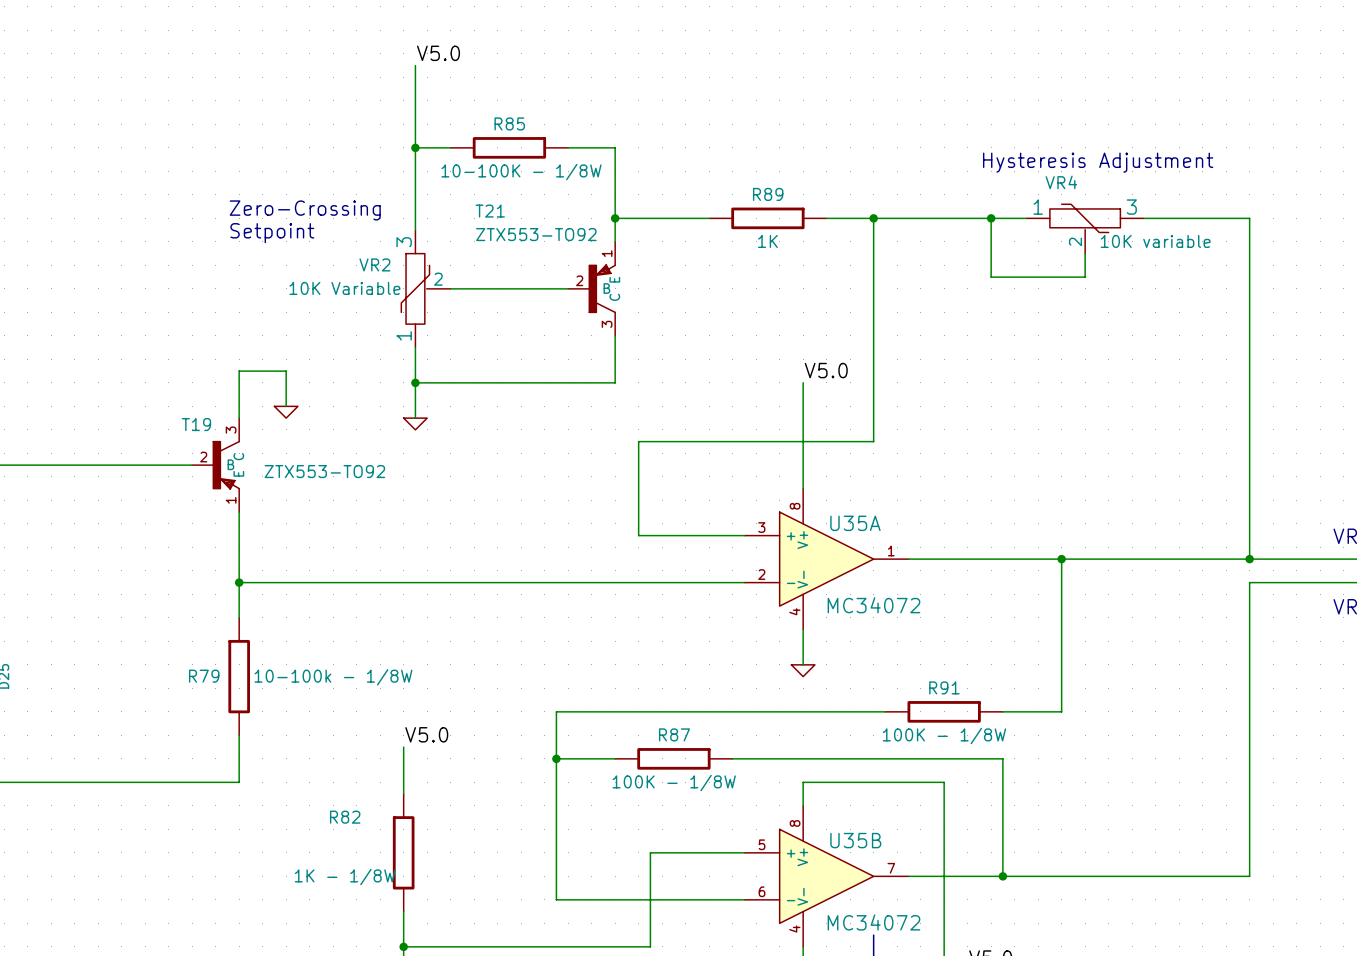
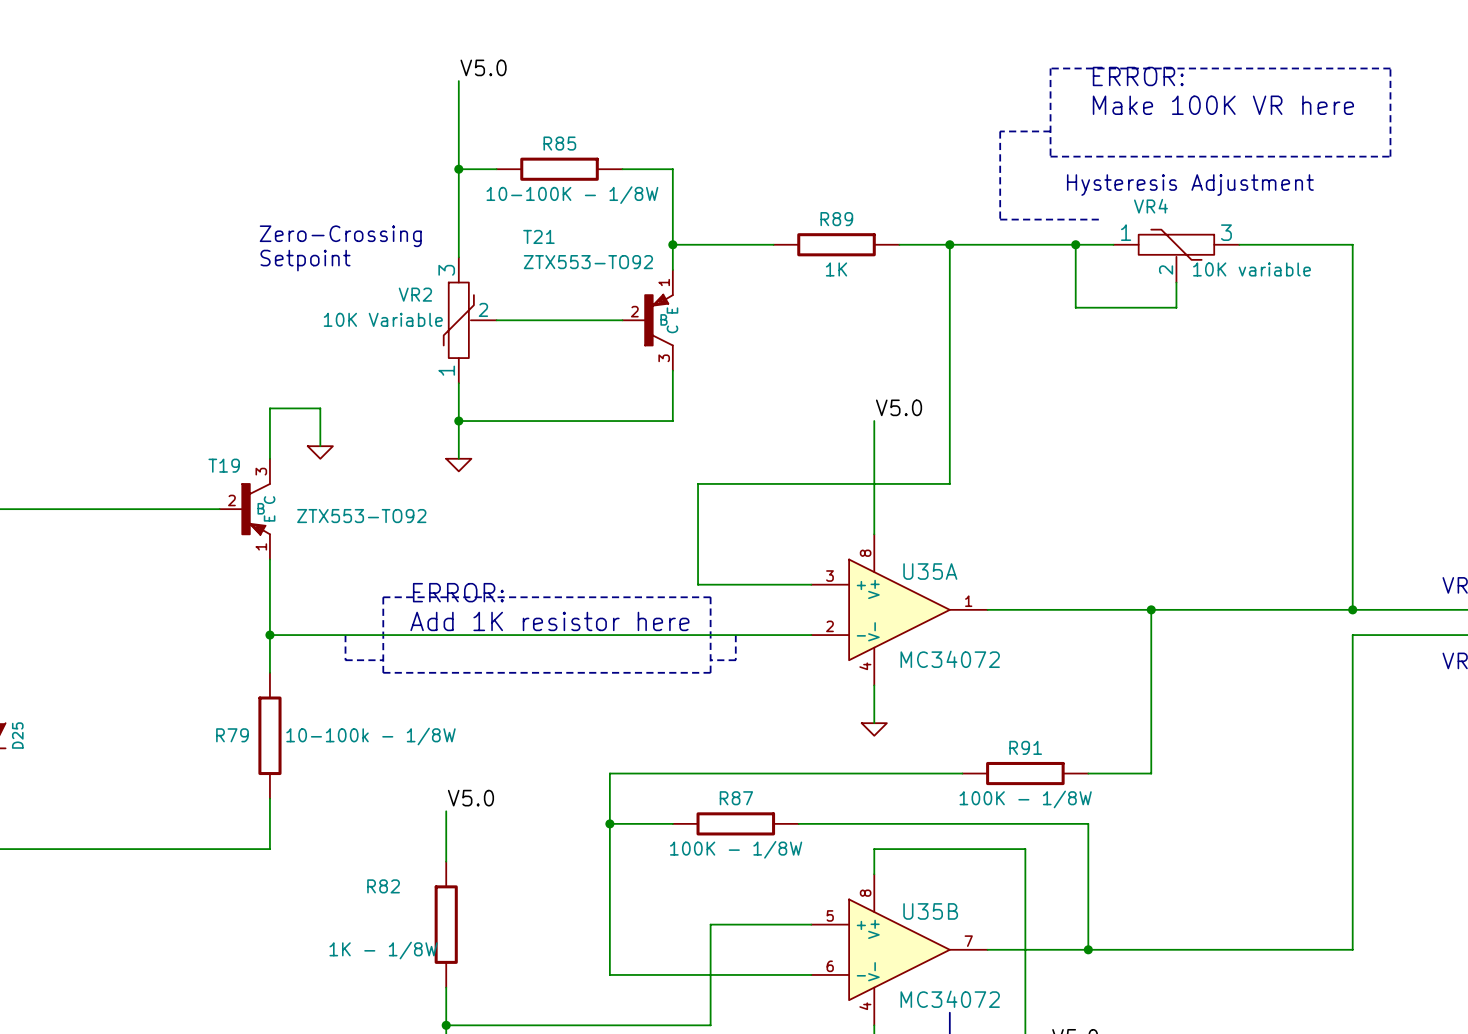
line: none -> (1050, 68) (1050, 156) (1390, 156) (1390, 68) (1050, 68)
text: none -> ERROR: (1138, 76)
text: none -> Make 100K VR here (1223, 105)
line: none -> (1050, 131) (1000, 131) (1000, 219) (1100, 219)
text: none -> ERROR: (458, 592)
line: none -> (383, 597) (710, 597) (710, 672) (383, 672) (383, 597)
text: none -> Add 1K resistor here (549, 621)
line: none -> (345, 635) (345, 660) (383, 660)
line: none -> (735, 635) (735, 660) (710, 660)

